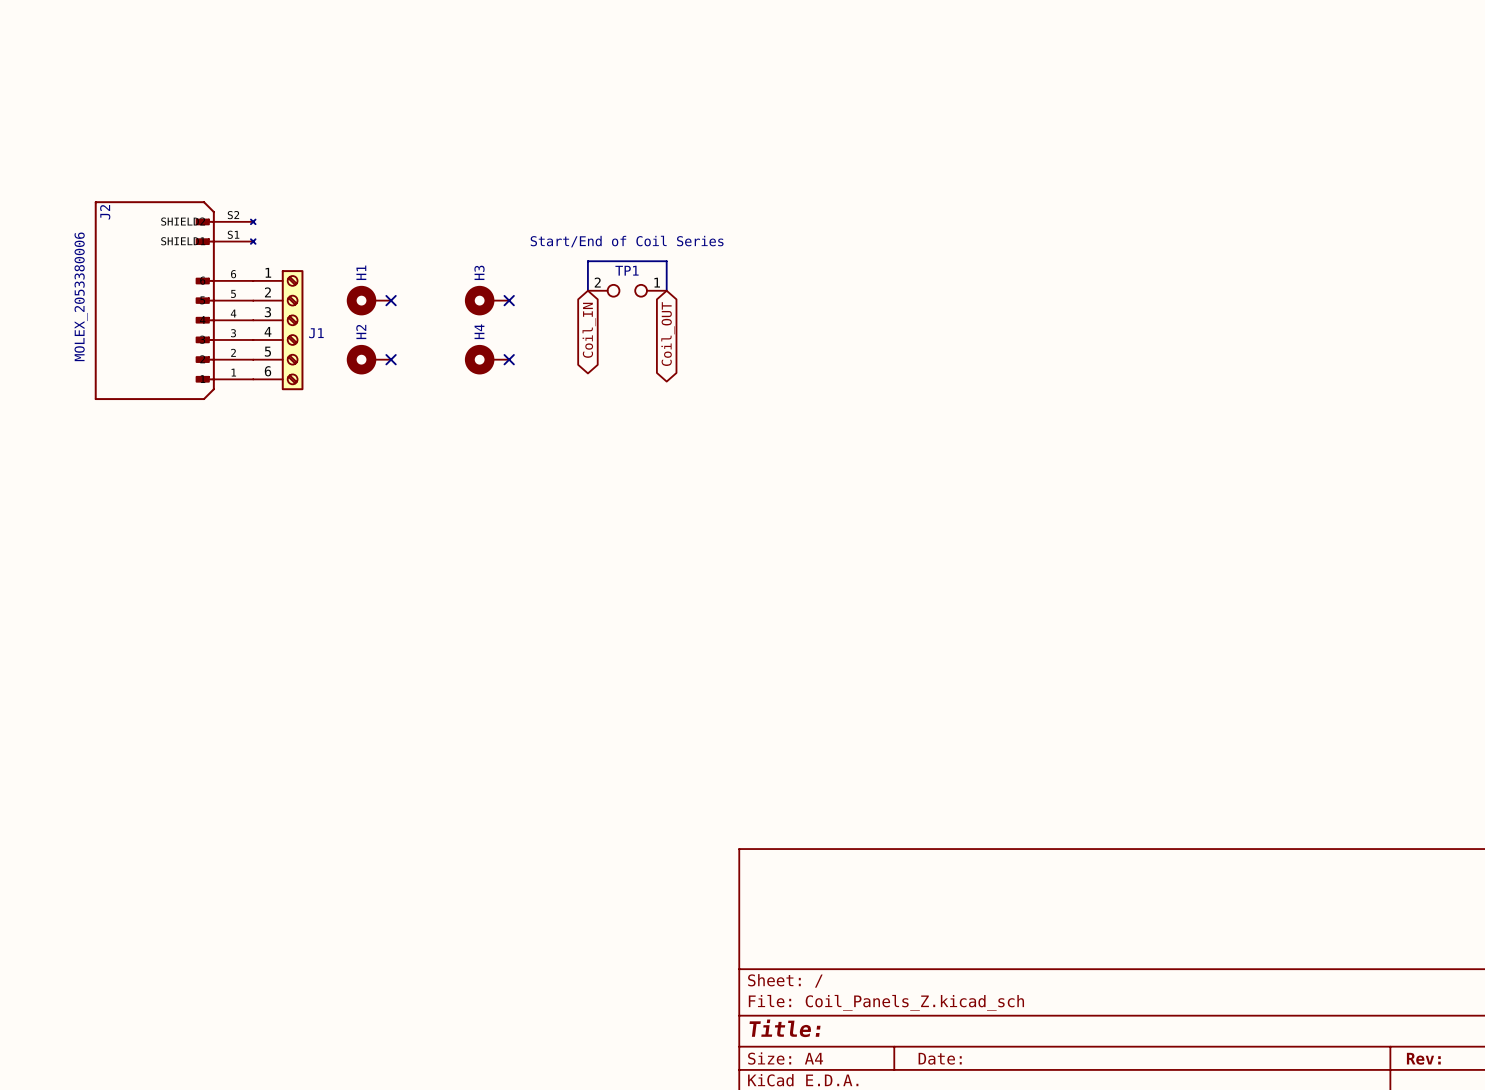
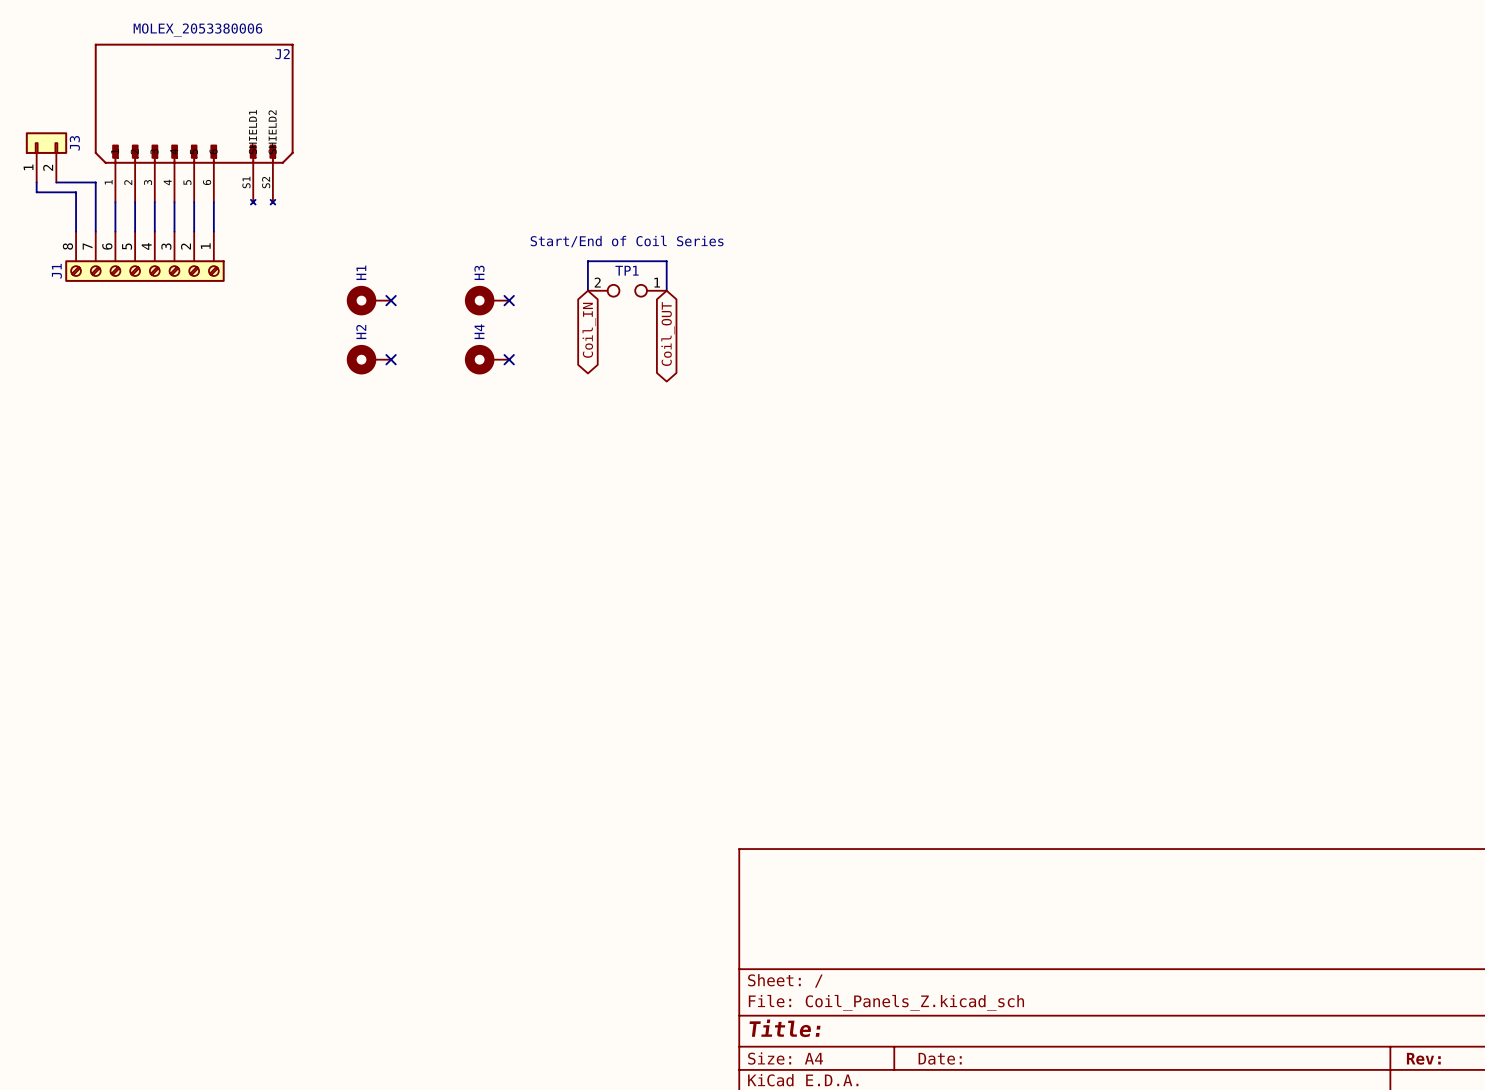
J3: none -> (46, 157)
wire: none -> (36, 182) (36, 192) (76, 192) (76, 231)
wire: none -> (56, 182) (95, 182) (95, 231)
wire: none -> (115, 202) (115, 231)
wire: none -> (135, 202) (135, 231)
wire: none -> (154, 202) (154, 231)
wire: none -> (174, 202) (174, 231)
wire: none -> (194, 202) (194, 231)
J1 symbol: [253, 270, 304, 391] -> [65, 231, 225, 282]
J2 rotation: 0° (175, 300) -> 90° clockwise (194, 124)
J2 position: (175, 300) -> (194, 124)
J1 name position: J1 (316, 333) -> J1 (56, 271)

